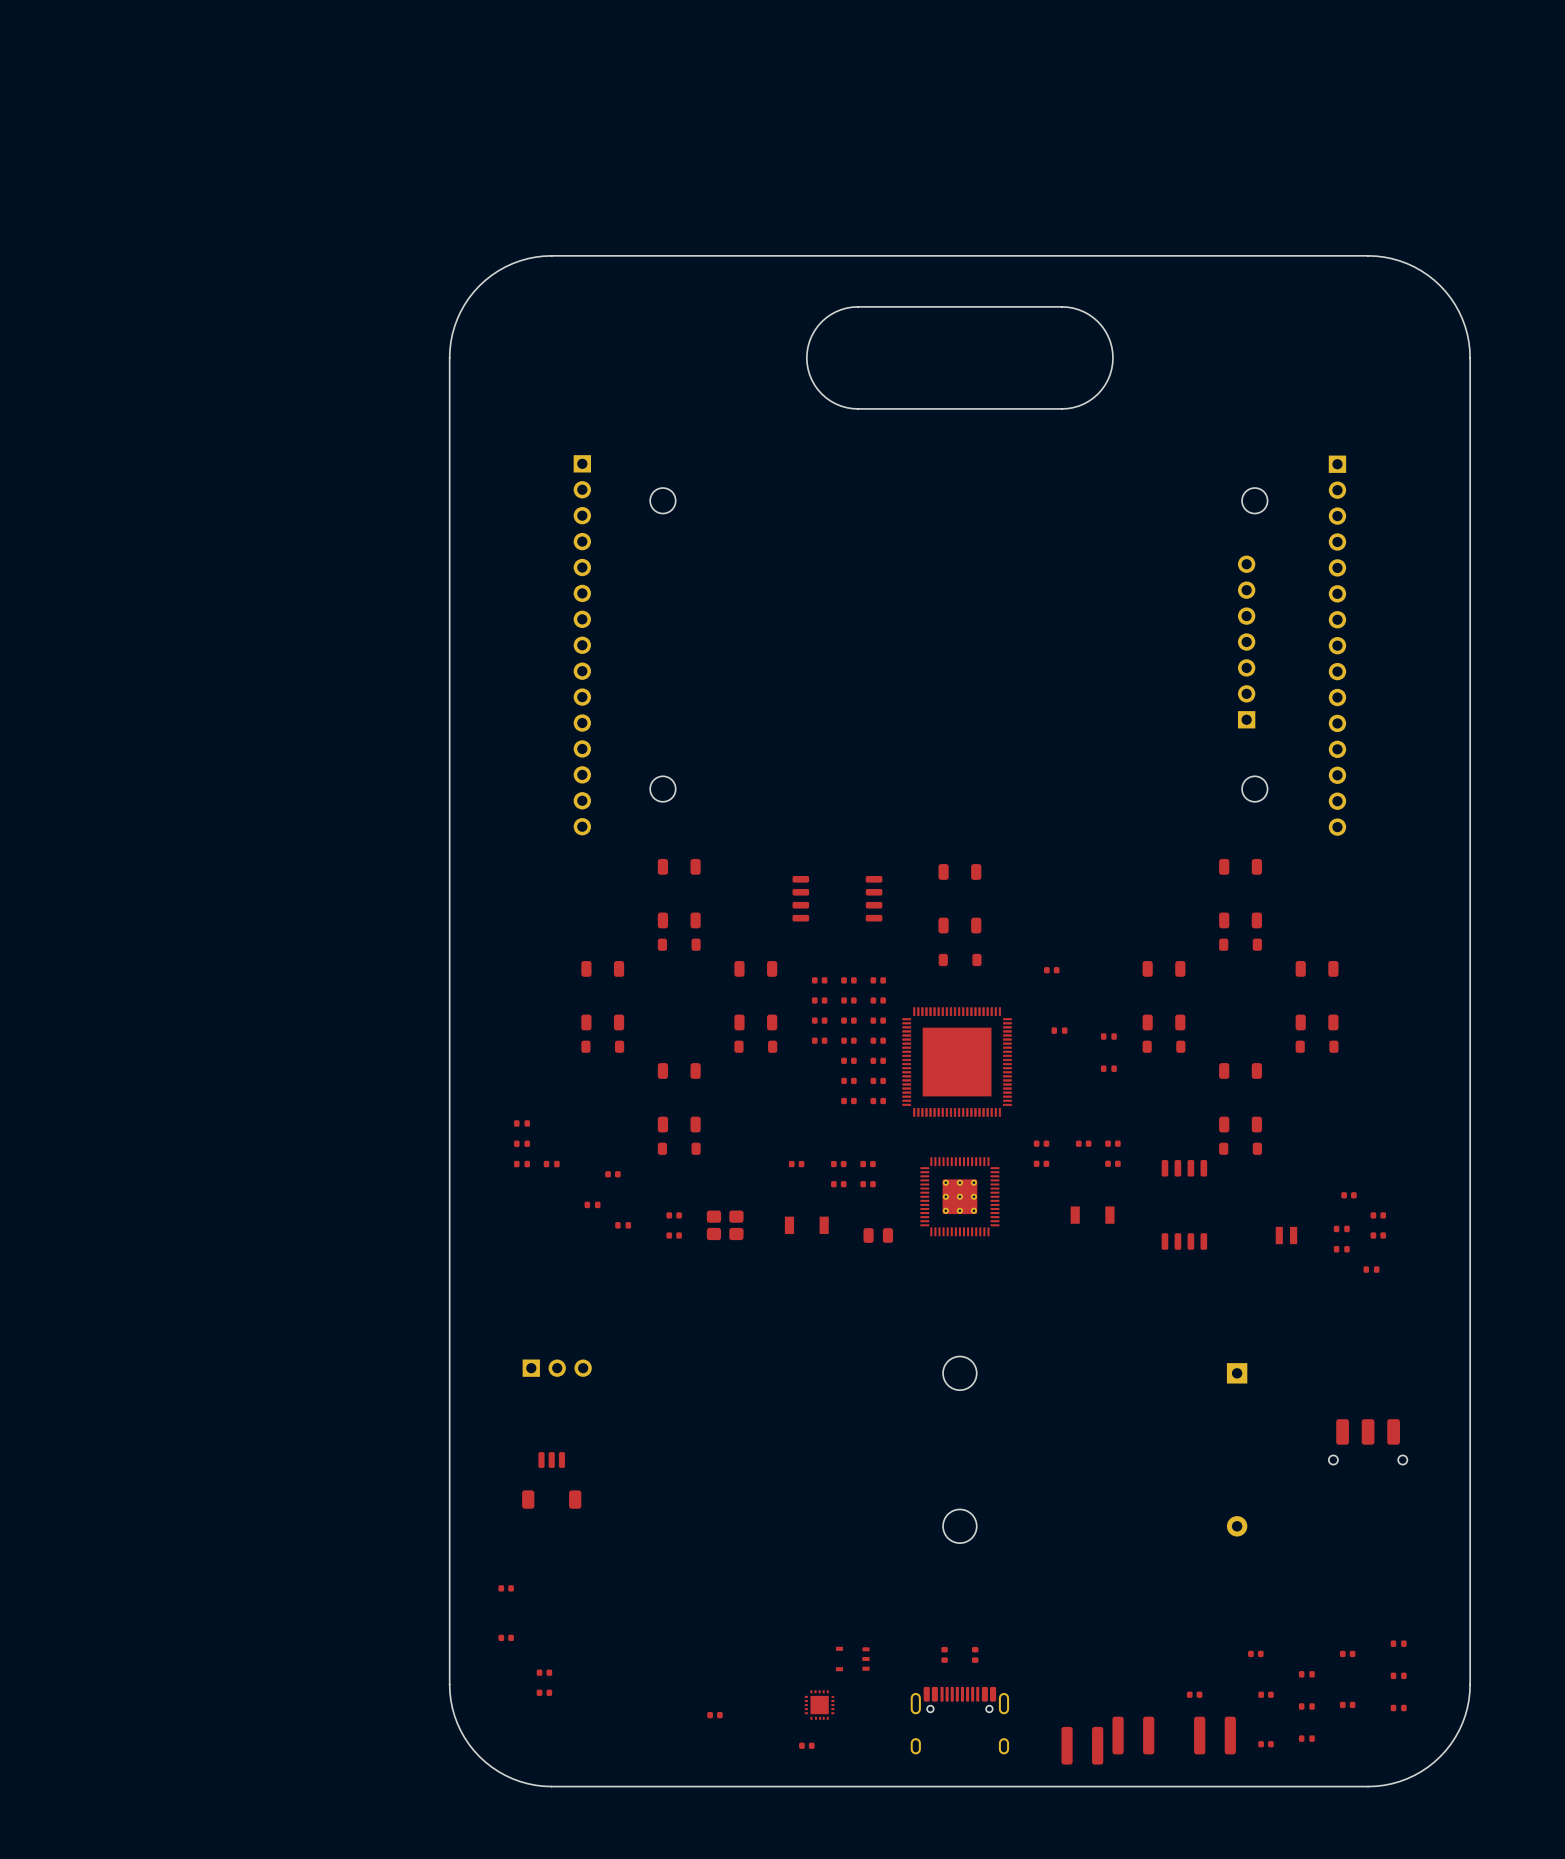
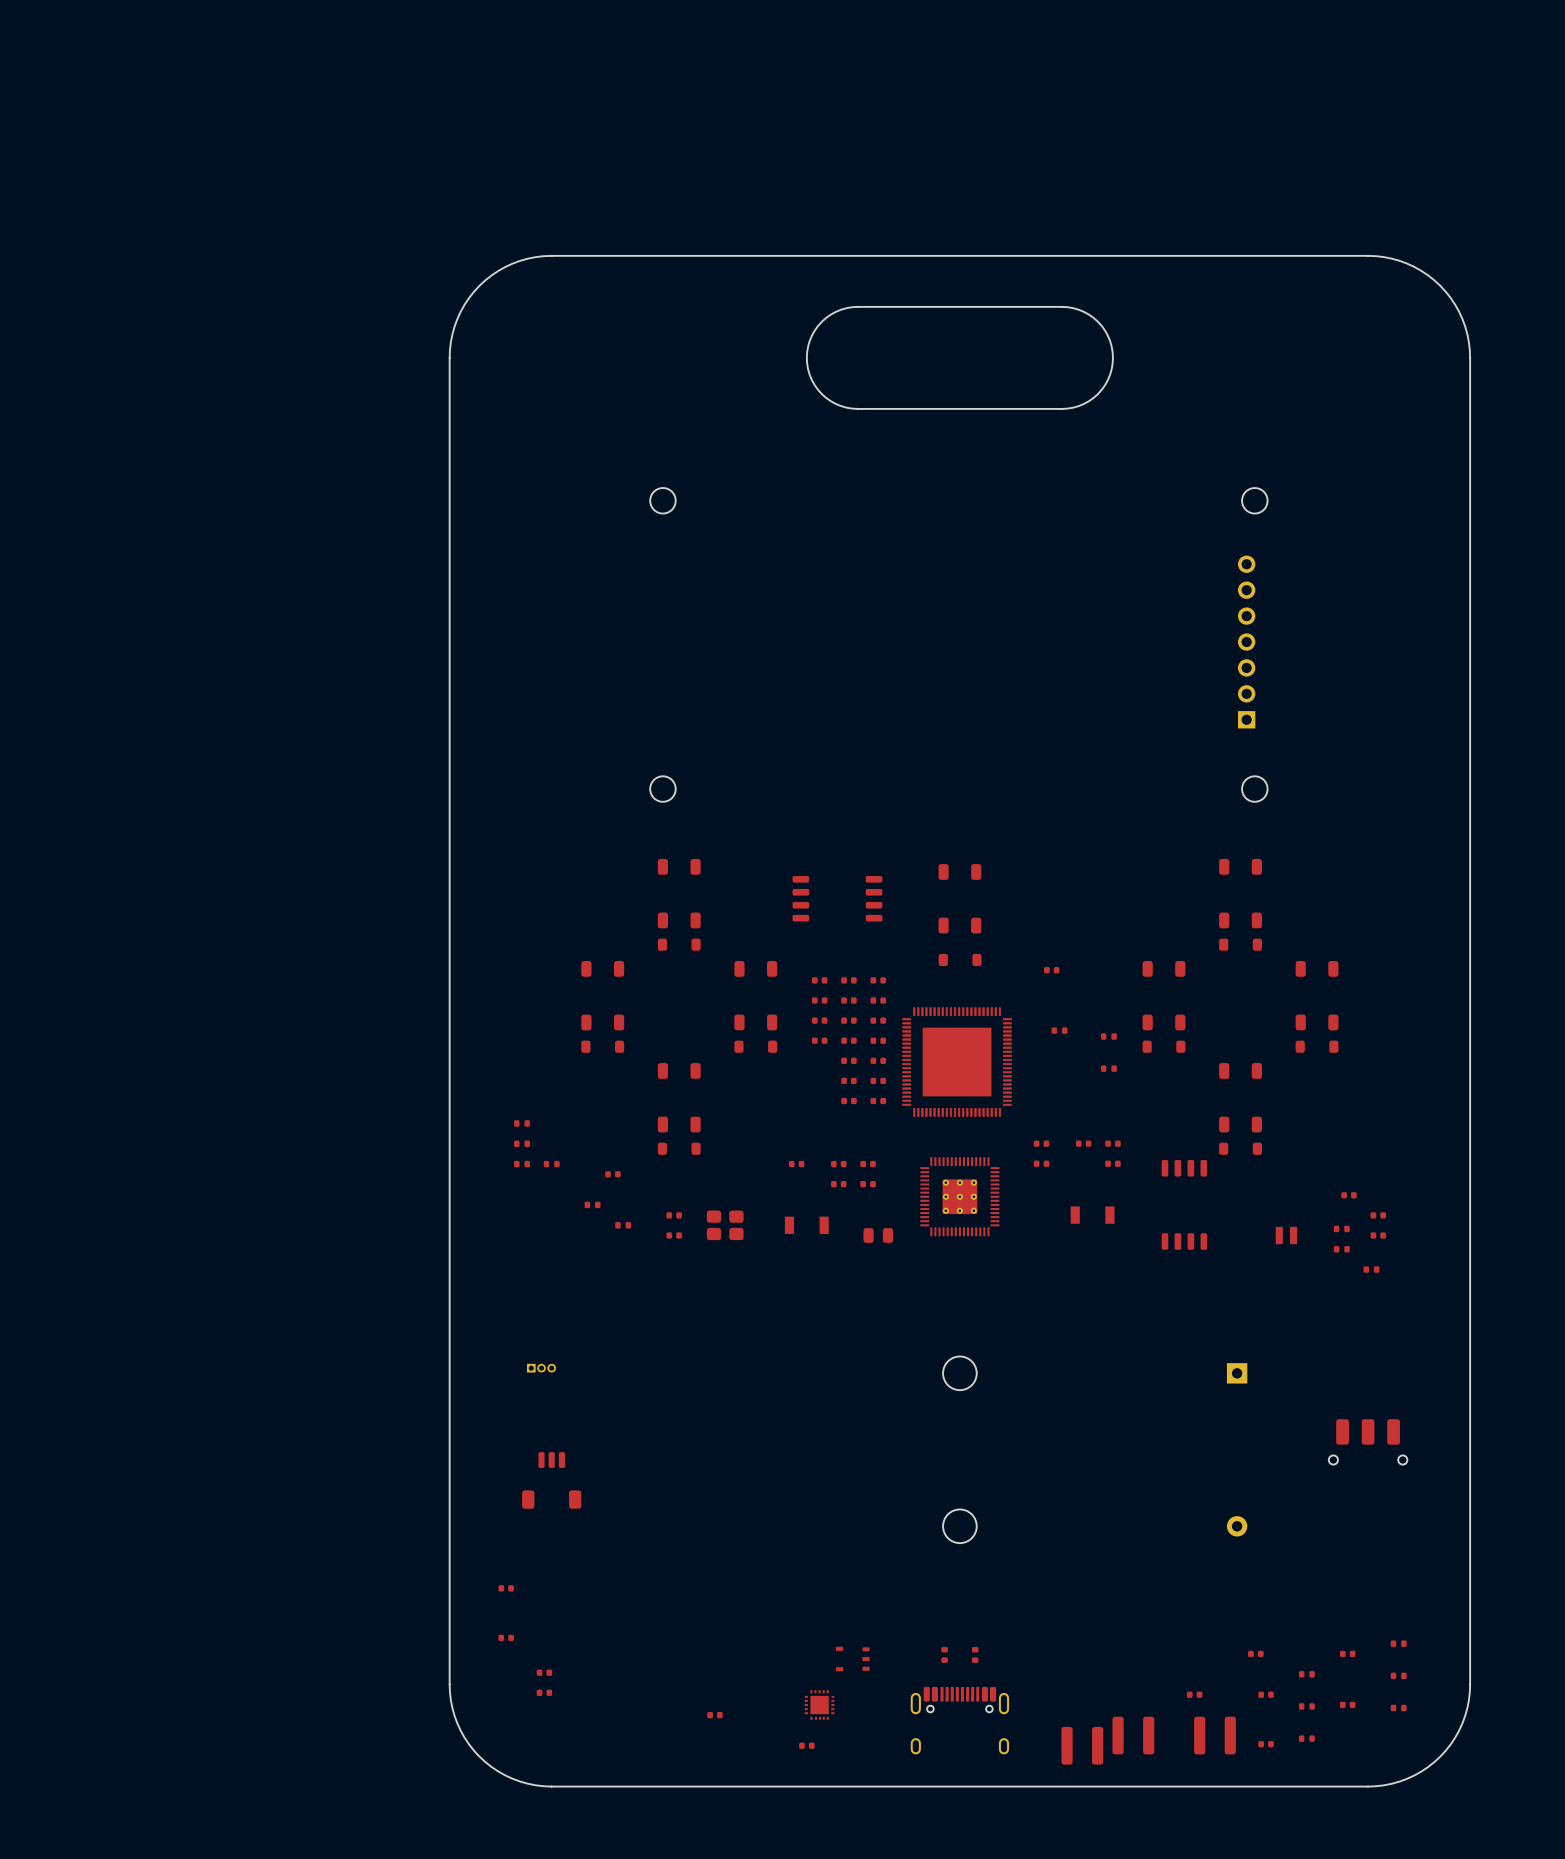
part: (582, 645) -> none
part: (1337, 645) -> none
part: none -> (541, 1368)
part: (557, 1368) -> none

